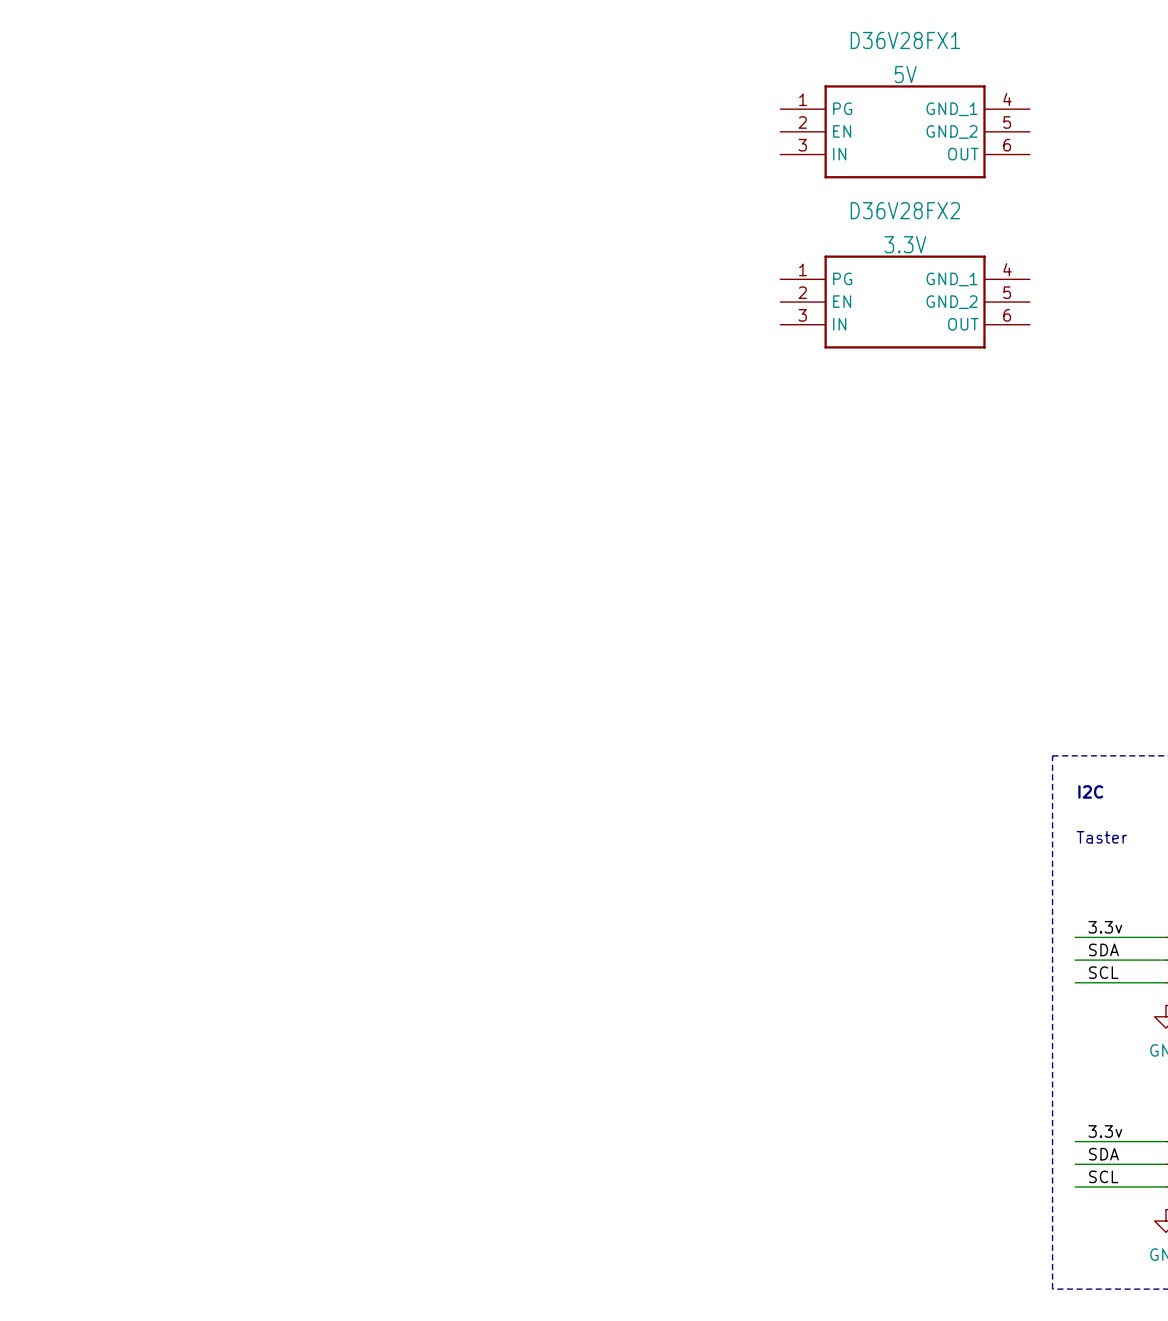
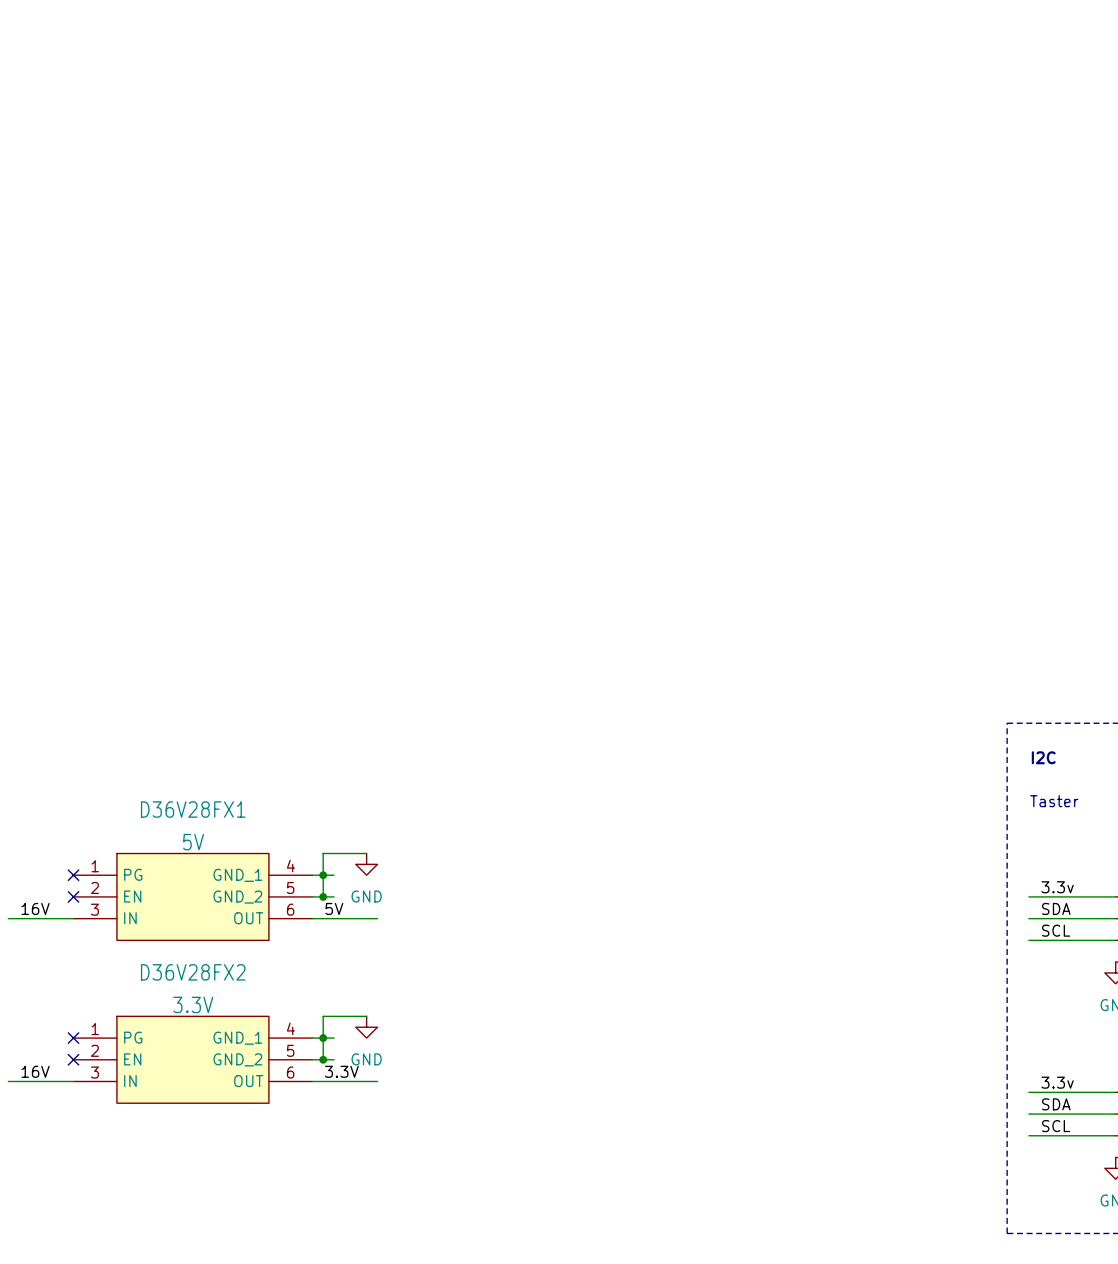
D36V28FX1 symbol: [780, 85, 1030, 179] -> [73, 853, 313, 941]
D36V28FX2 symbol: [780, 255, 1030, 349] -> [73, 1016, 313, 1104]
wire: none -> (366, 853) (323, 853) (323, 896)
power symbol: none -> GND (366, 864)
no-connect mark: none -> (73, 875)
wire: none -> (312, 875) (334, 875)
junction: none -> (323, 875)
no-connect mark: none -> (73, 896)
wire: none -> (312, 896) (334, 896)
junction: none -> (323, 896)
label: none -> 16V (35, 908)
label: none -> 5V (334, 908)
wire: none -> (8, 918) (73, 918)
wire: none -> (312, 918) (377, 918)
wire: none -> (366, 1016) (323, 1016) (323, 1059)
power symbol: none -> GND (366, 1027)
no-connect mark: none -> (73, 1038)
wire: none -> (312, 1038) (334, 1038)
junction: none -> (323, 1038)
no-connect mark: none -> (73, 1059)
wire: none -> (312, 1059) (334, 1059)
junction: none -> (323, 1059)
label: none -> 16V (35, 1071)
label: none -> 3.3V (341, 1071)
wire: none -> (8, 1081) (73, 1081)
wire: none -> (312, 1081) (377, 1081)

